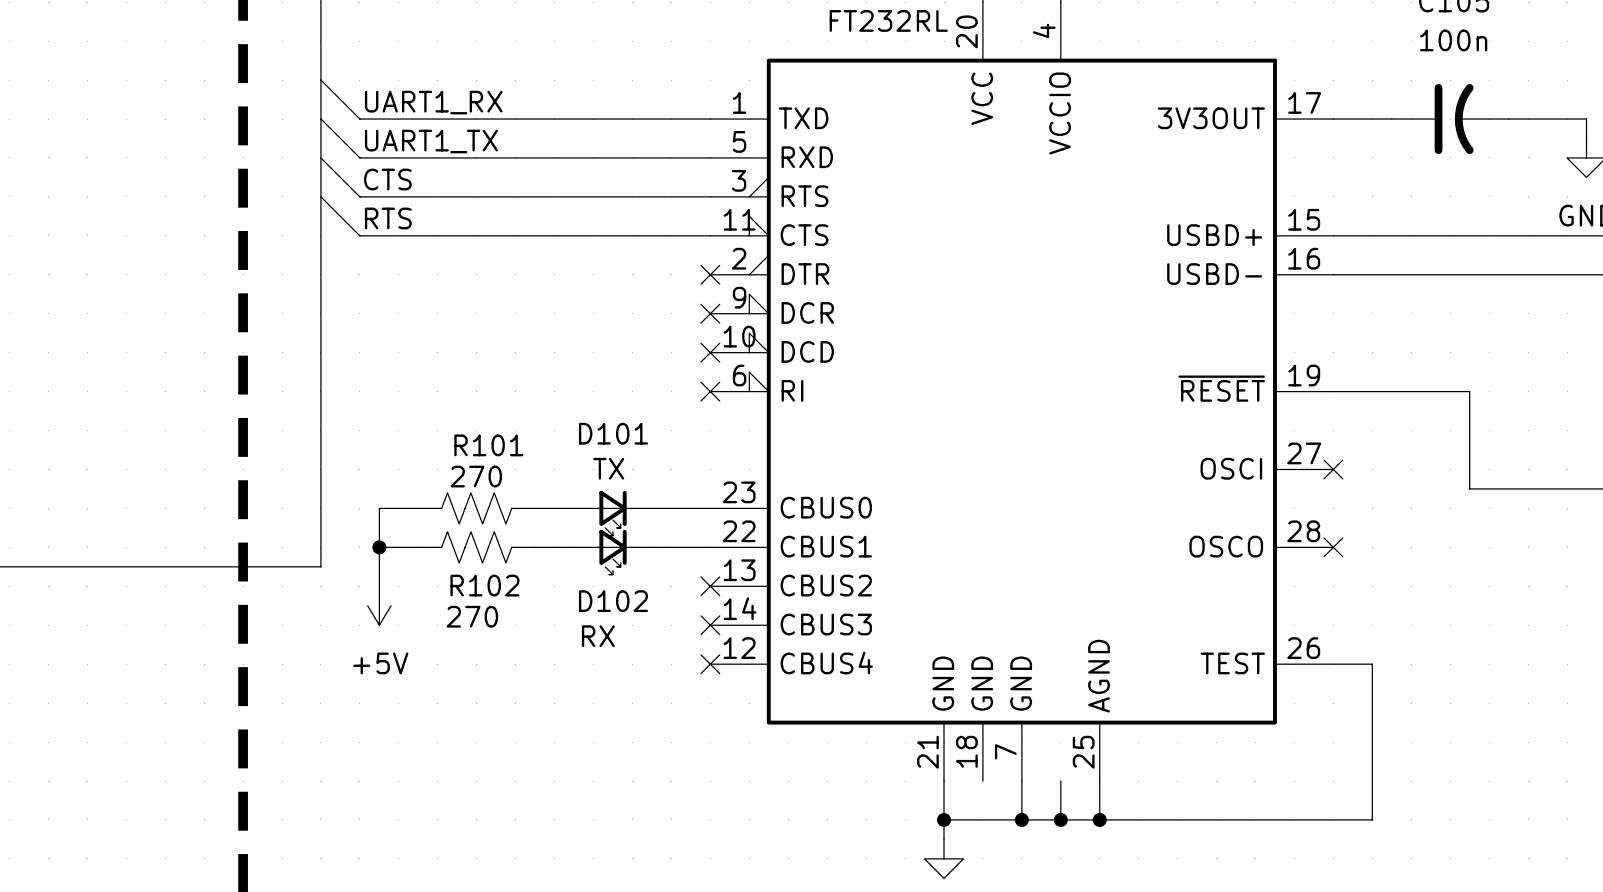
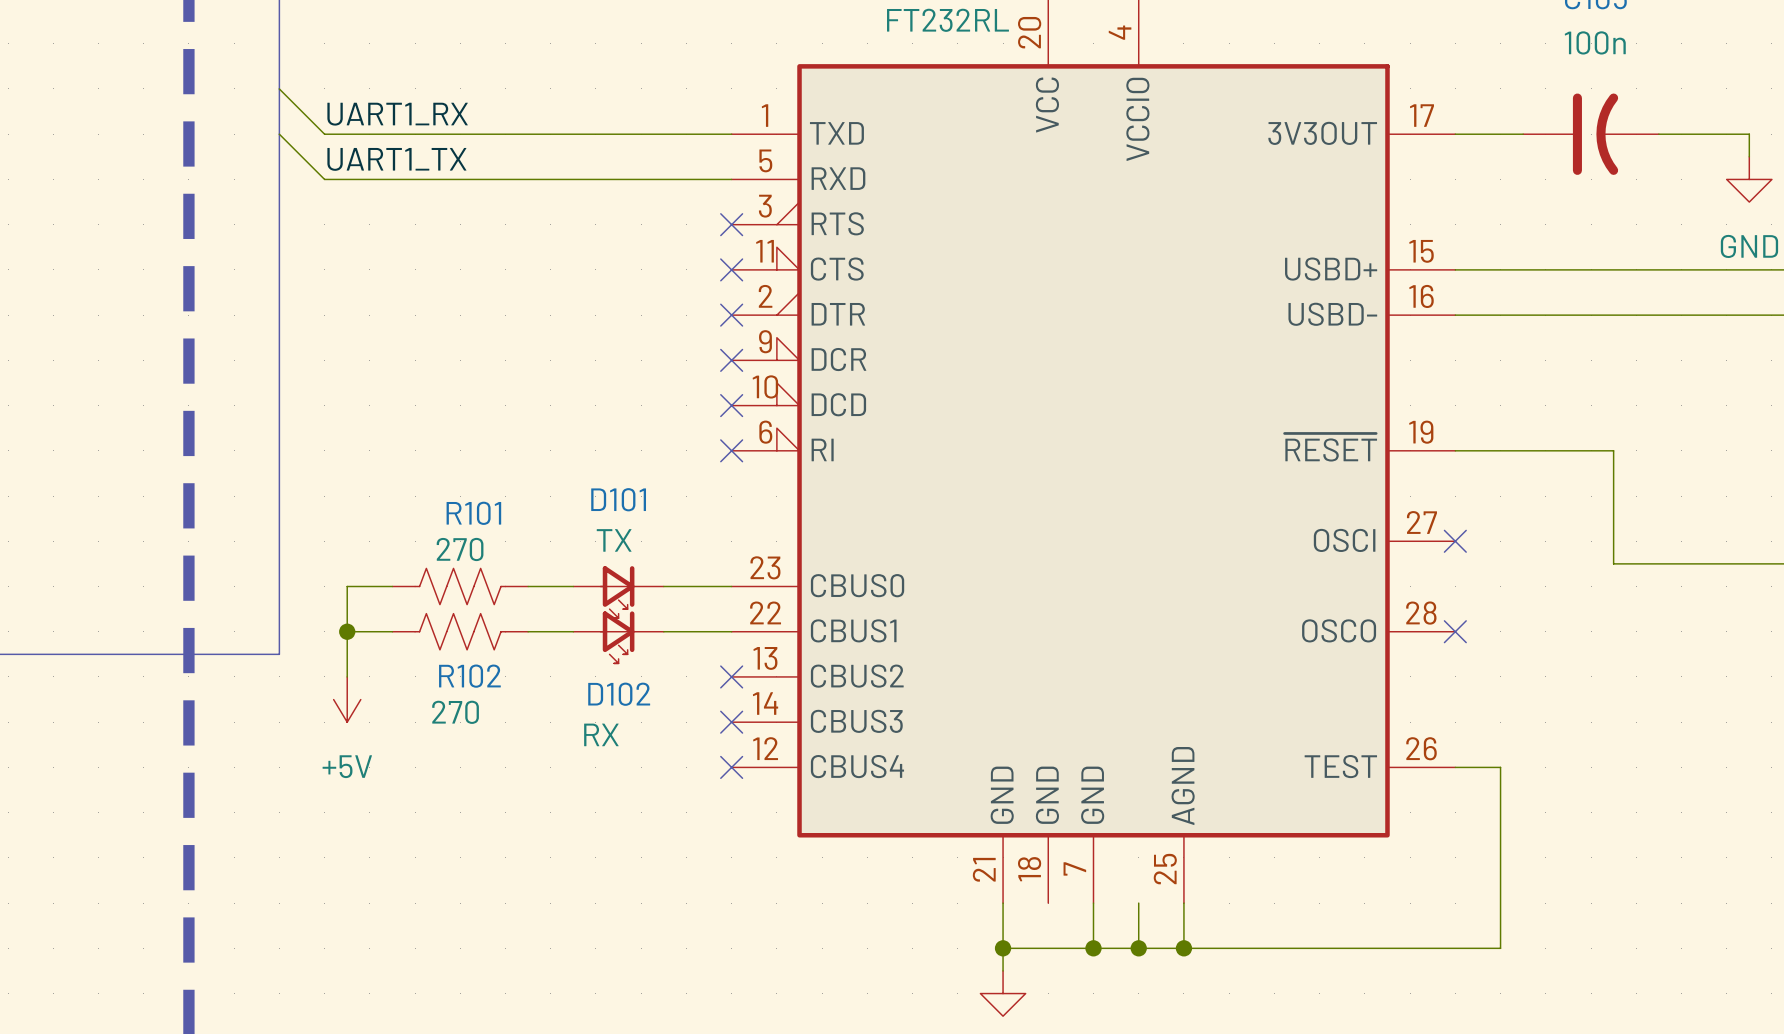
wire: (320, 157) (359, 196) (710, 196) -> none
label: CTS (387, 179) -> none
wire: (320, 196) (359, 235) (710, 235) -> none
no-connect mark: none -> (731, 224)
label: RTS (388, 218) -> none
no-connect mark: none -> (731, 269)

